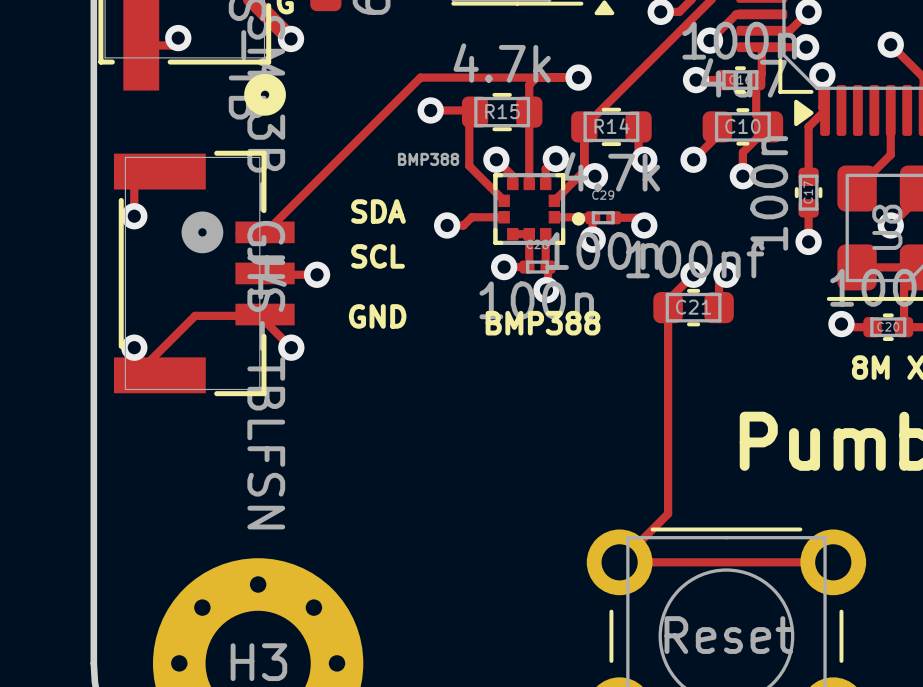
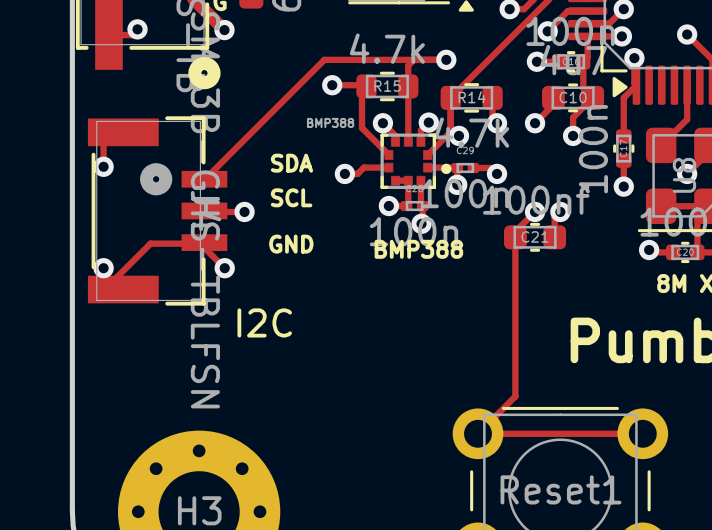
text: none -> I2C (264, 322)
Reset name: Reset (728, 635) -> Reset1 (561, 489)

